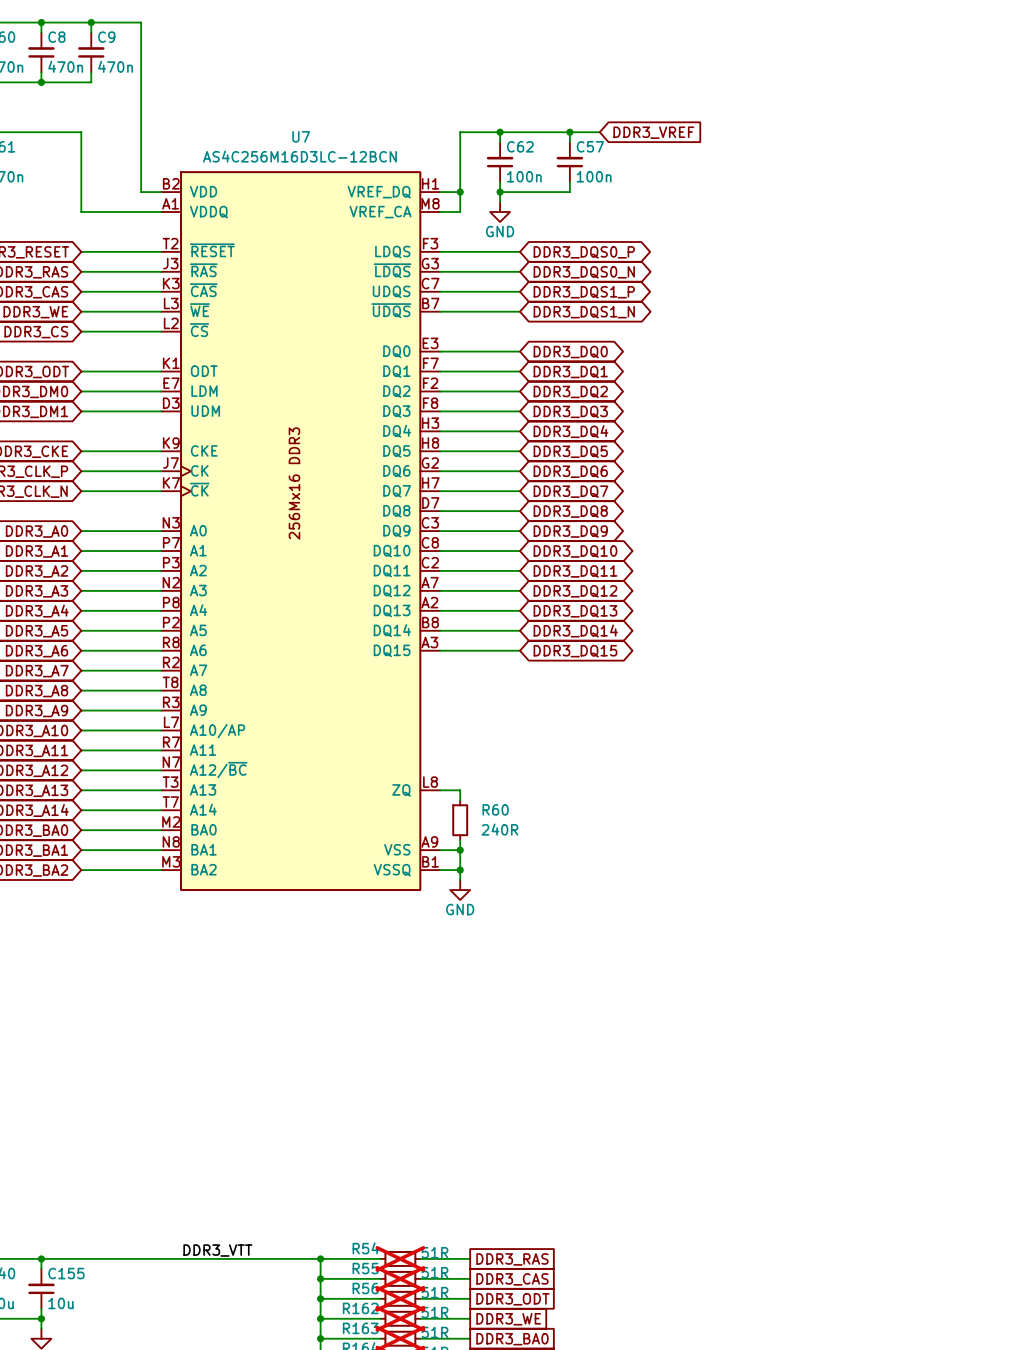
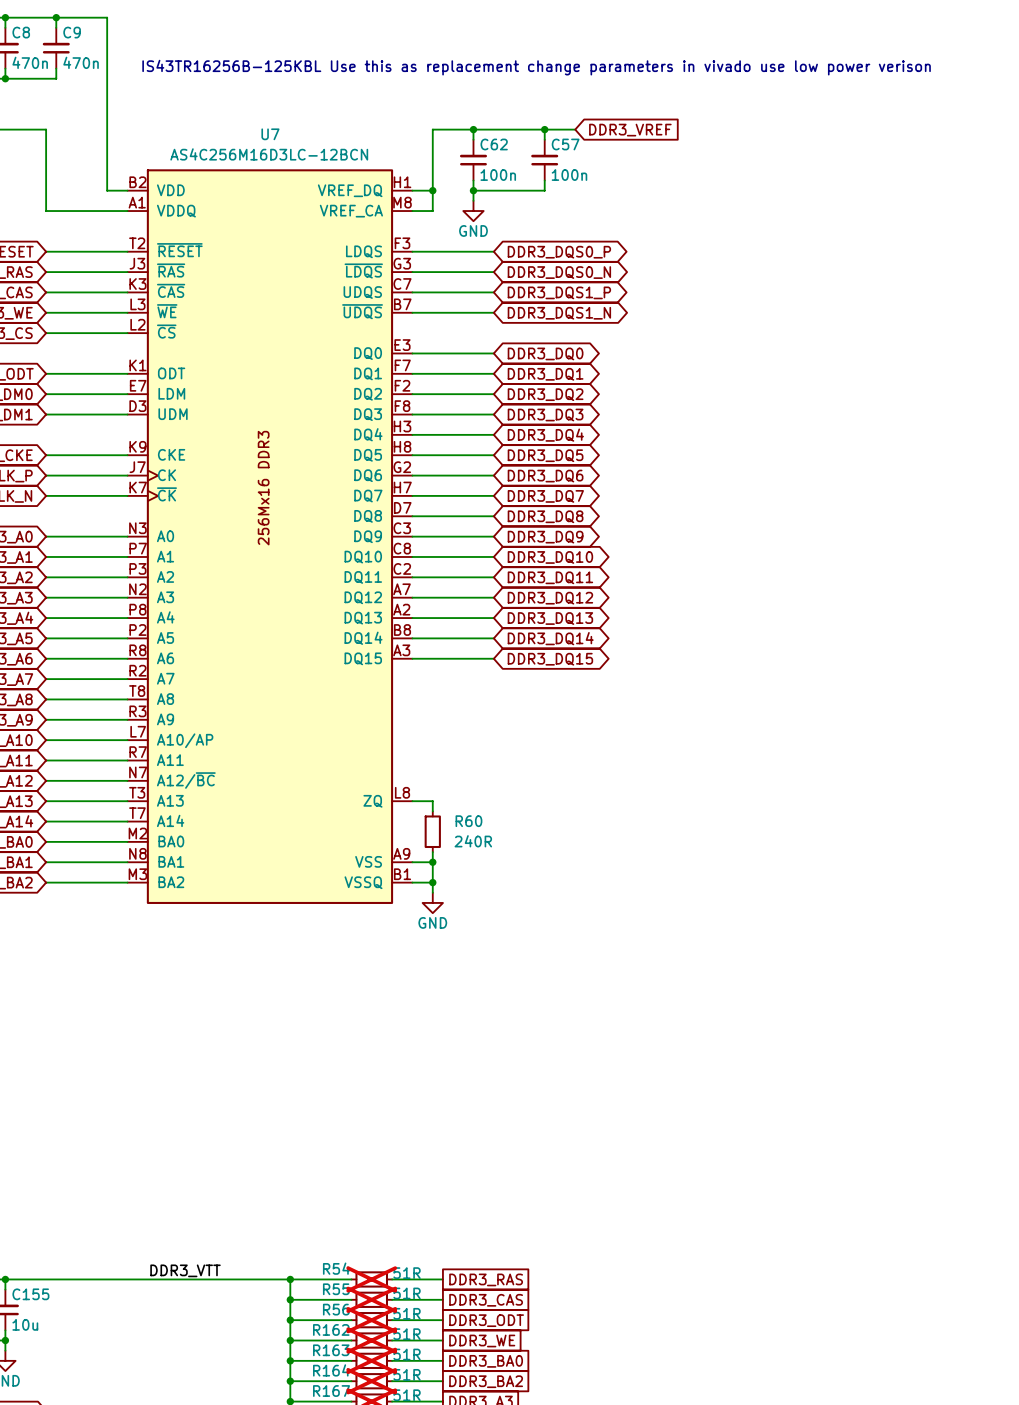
text: none -> IS43TR16256B-125KBL Use this as replacement change parameters in vivado use low power verison (536, 67)

